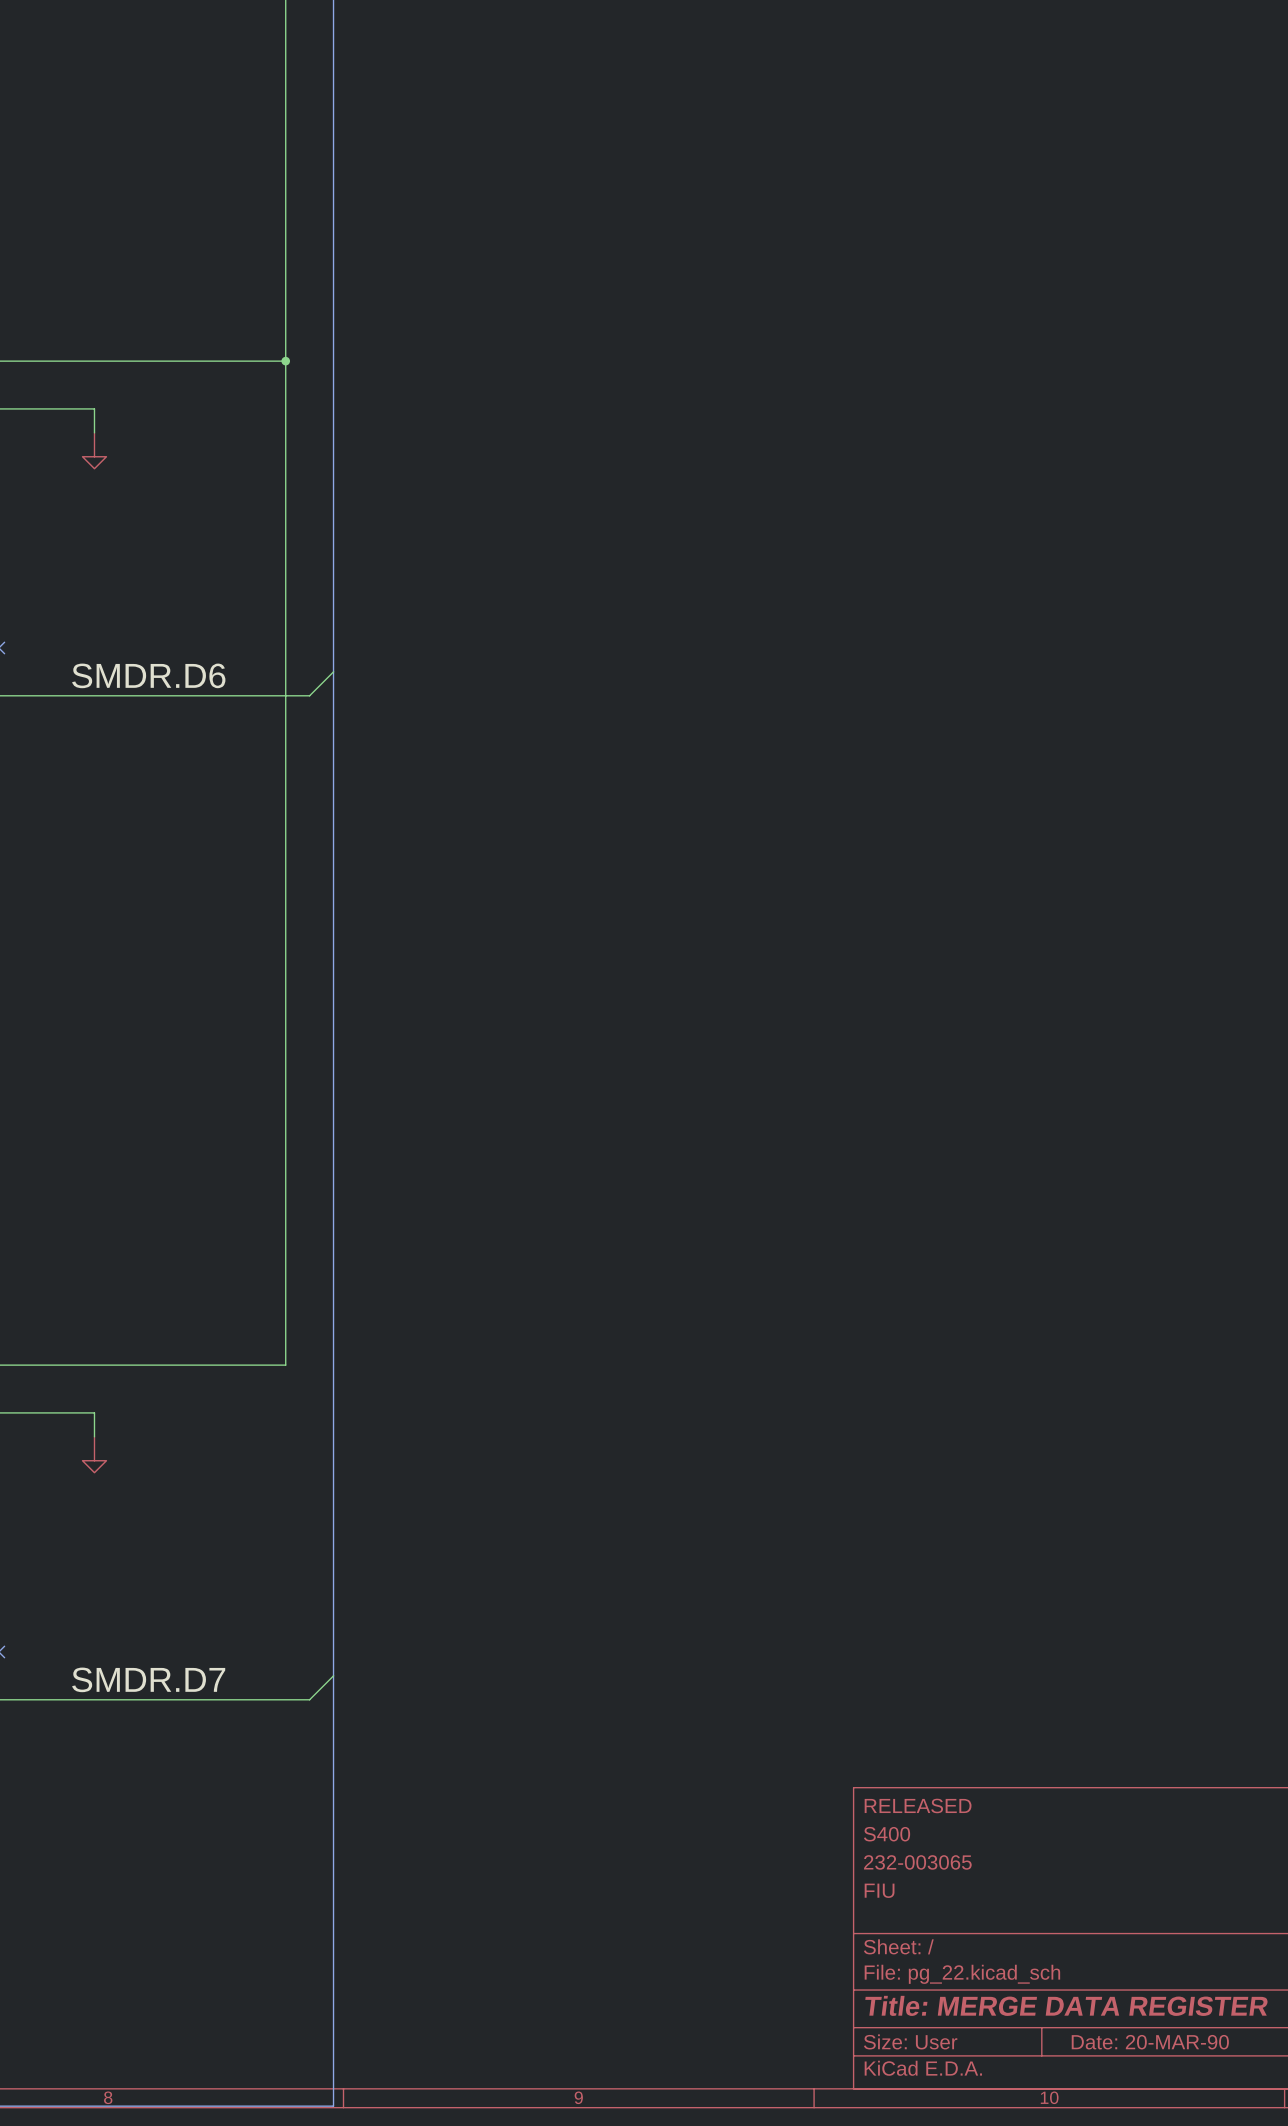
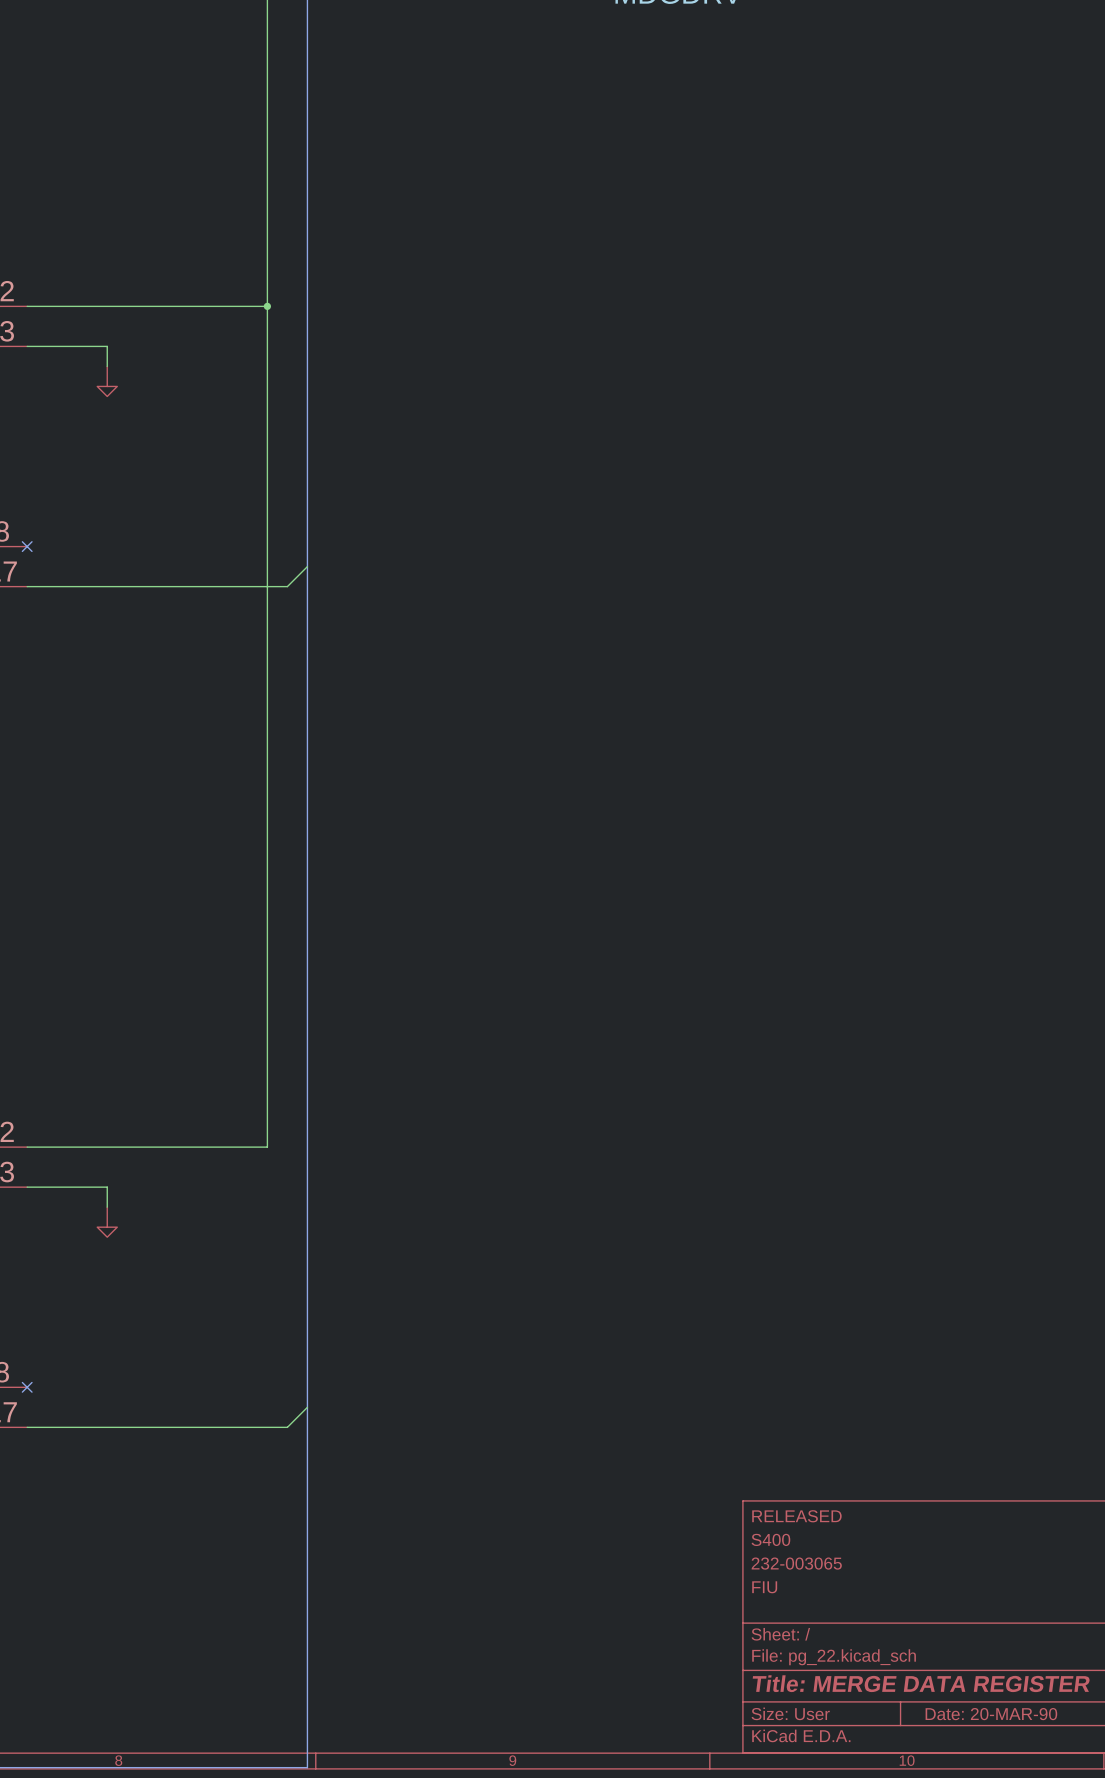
label: SMDR.D6 (148, 675) -> none
label: SMDR.D7 (148, 1679) -> none

